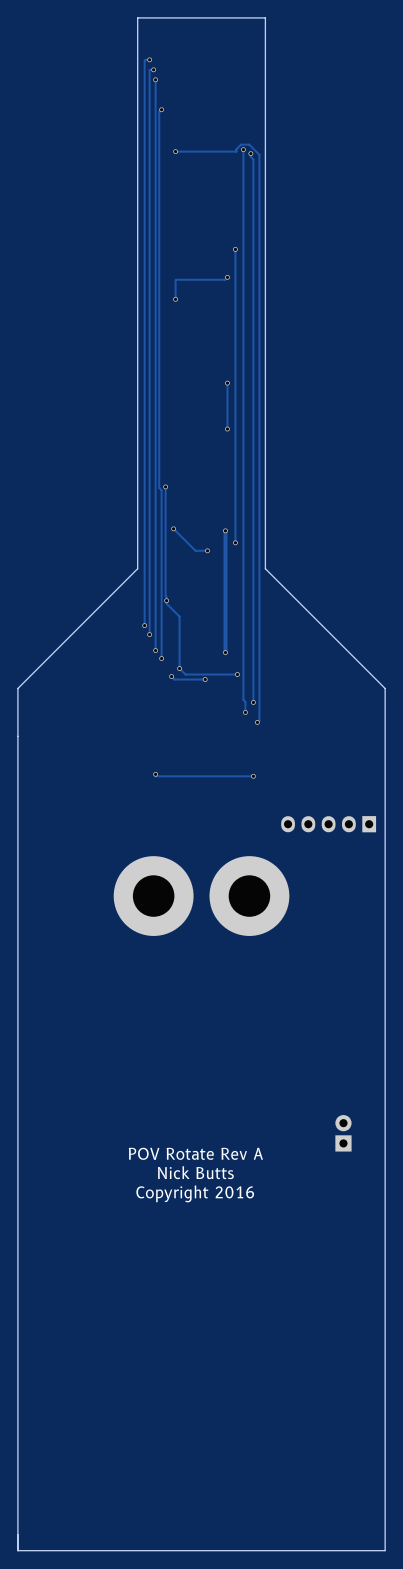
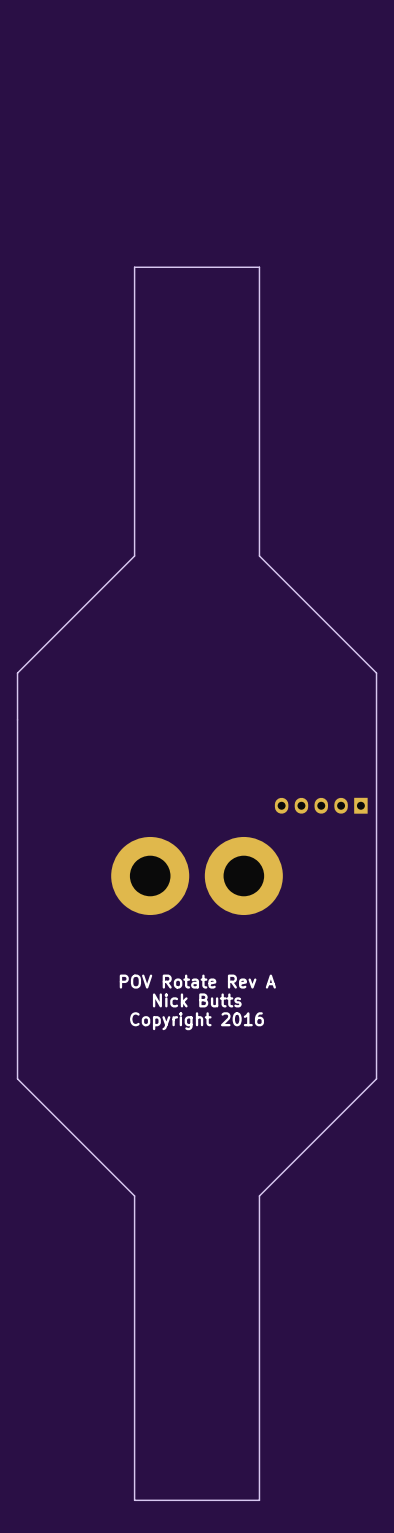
track: (149, 59) (144, 60) (144, 625) -> none
via: (149, 59) -> none
track: (153, 69) (149, 69) (149, 634) -> none
via: (153, 69) -> none
track: (155, 79) (155, 650) -> none
via: (155, 79) -> none
track: (161, 109) (159, 112) (159, 487) (161, 490) (161, 658) -> none
via: (161, 109) -> none
track: (243, 149) (243, 699) (245, 701) (245, 712) -> none
via: (243, 149) -> none
track: (175, 151) (236, 151) (241, 144) (249, 144) (259, 154) (259, 720) (257, 722) -> none
via: (175, 151) -> none
track: (250, 153) (253, 159) (253, 702) -> none
via: (250, 153) -> none
track: (235, 249) (235, 542) -> none
via: (235, 249) -> none
board edge: (265, 273) (265, 17) (137, 17) (137, 273) -> (259, 267) (134, 267)
track: (227, 277) (225, 279) (175, 279) (175, 299) -> none
via: (227, 277) -> none
via: (175, 299) -> none
track: (227, 383) (227, 429) -> none
via: (227, 383) -> none
via: (227, 429) -> none
track: (165, 486) (165, 596) (166, 603) (179, 616) (179, 668) (185, 674) (237, 674) -> none
via: (165, 486) -> none
track: (173, 528) (195, 550) (207, 550) -> none
via: (173, 528) -> none
track: (225, 530) (225, 652) -> none
via: (225, 530) -> none
via: (235, 542) -> none
via: (207, 550) -> none
via: (166, 600) -> none
via: (144, 625) -> none
via: (149, 634) -> none
via: (155, 650) -> none
via: (225, 652) -> none
via: (161, 658) -> none
via: (179, 668) -> none
via: (237, 674) -> none
track: (171, 676) (174, 679) (205, 679) -> none
via: (171, 676) -> none
via: (205, 679) -> none
via: (253, 702) -> none
via: (245, 712) -> none
via: (257, 722) -> none
track: (155, 774) (155, 776) (253, 776) -> none
via: (155, 774) -> none
via: (253, 776) -> none
board edge: (385, 1103) (385, 1550) (17, 1550) (17, 1103) -> (376, 1078) (259, 1195) (259, 1500) (134, 1500) (134, 1195) (17, 1078)
part: (343, 1133) -> none
text position: POV Rotate Rev A (195, 1153) -> POV Rotate Rev A (197, 981)
text position: Nick Butts (195, 1172) -> Nick Butts (197, 1000)
text position: Copyright 2016 (195, 1193) -> Copyright 2016 (197, 1021)

